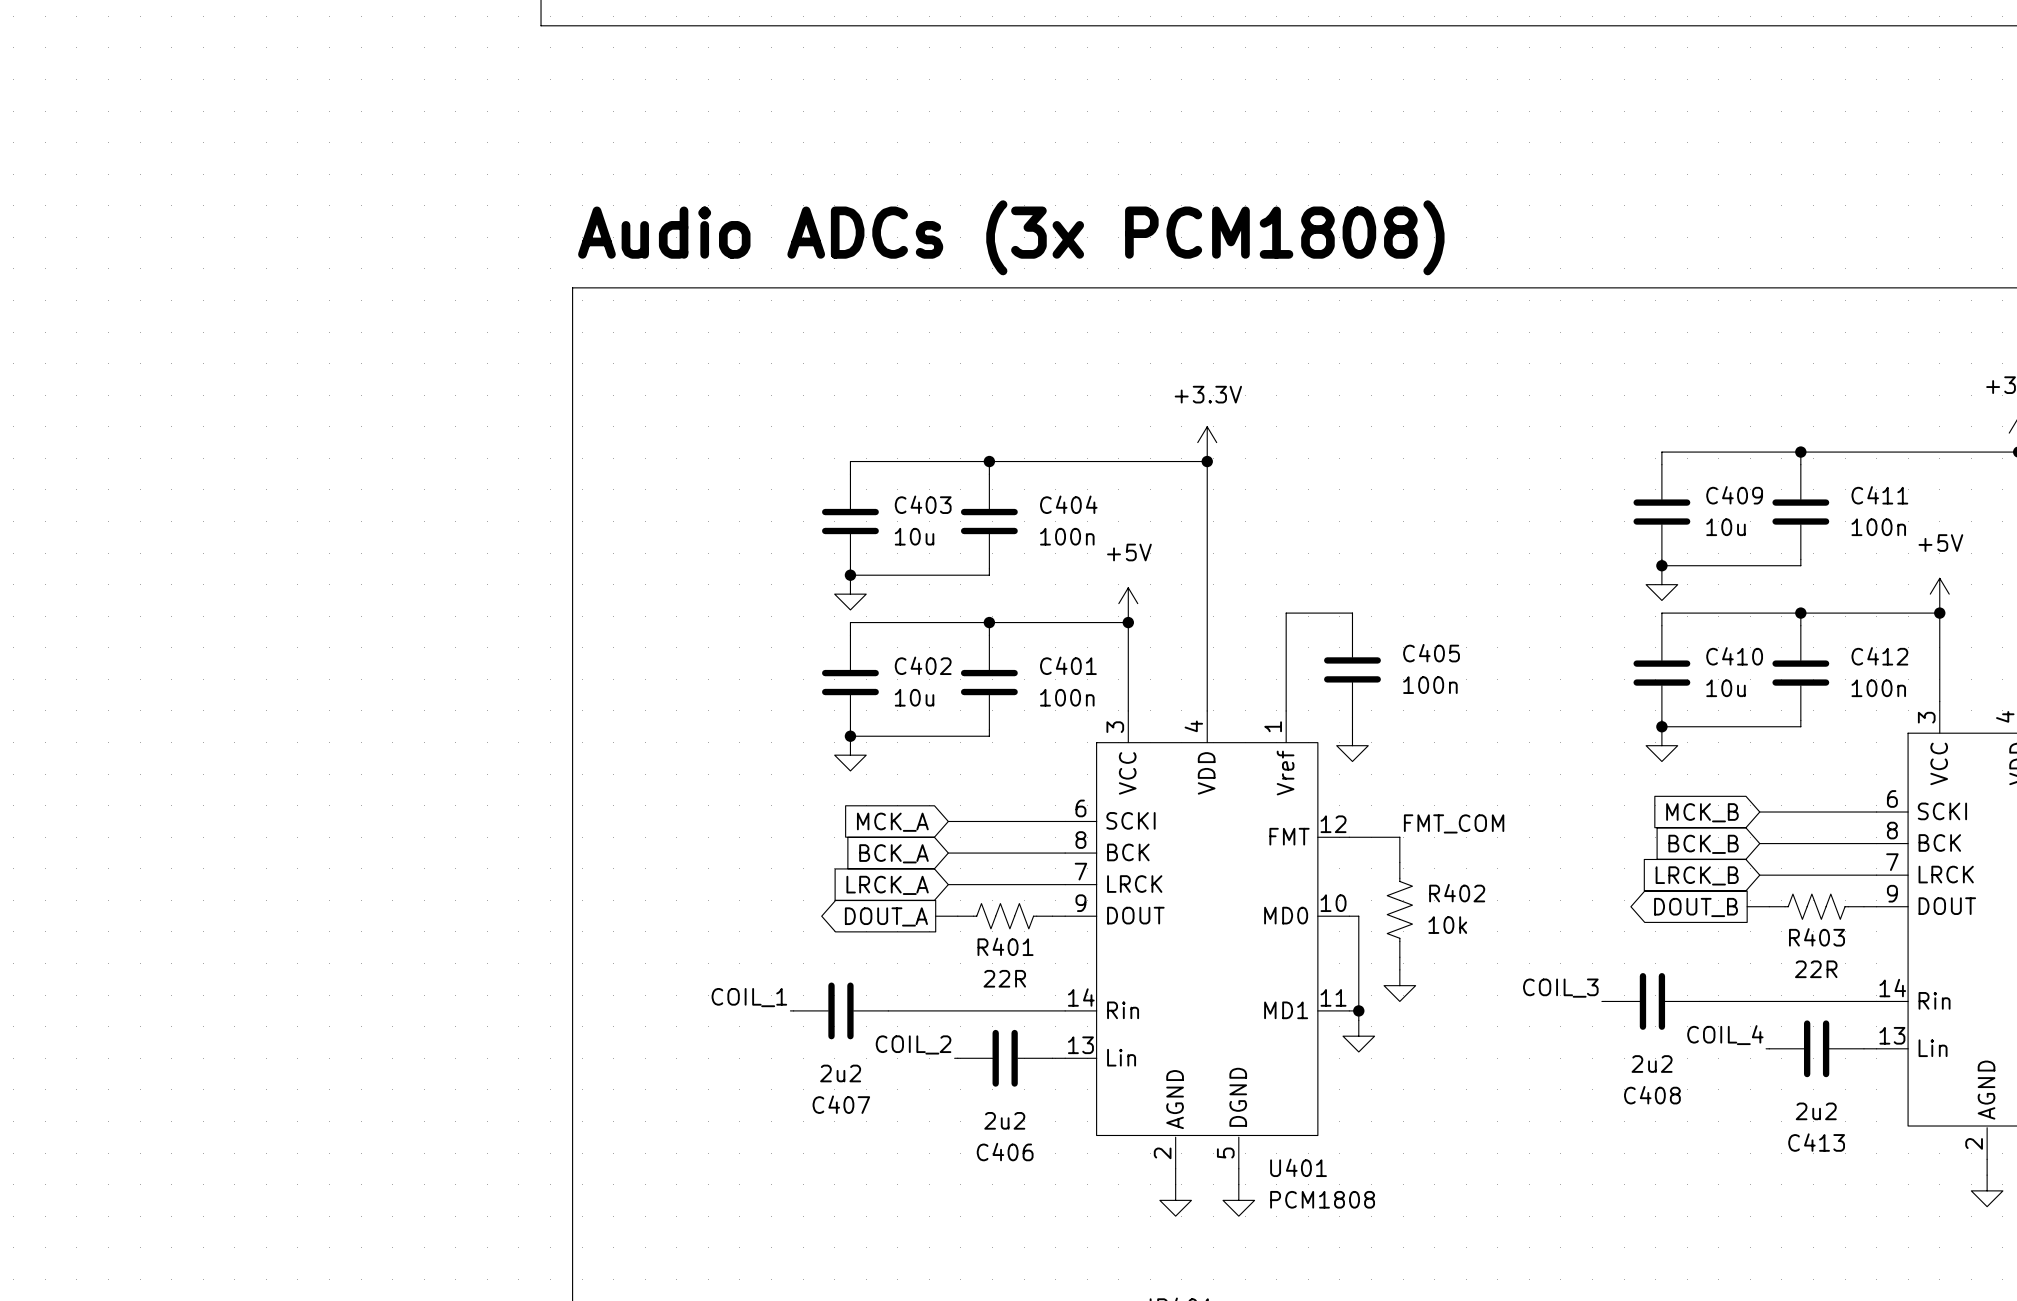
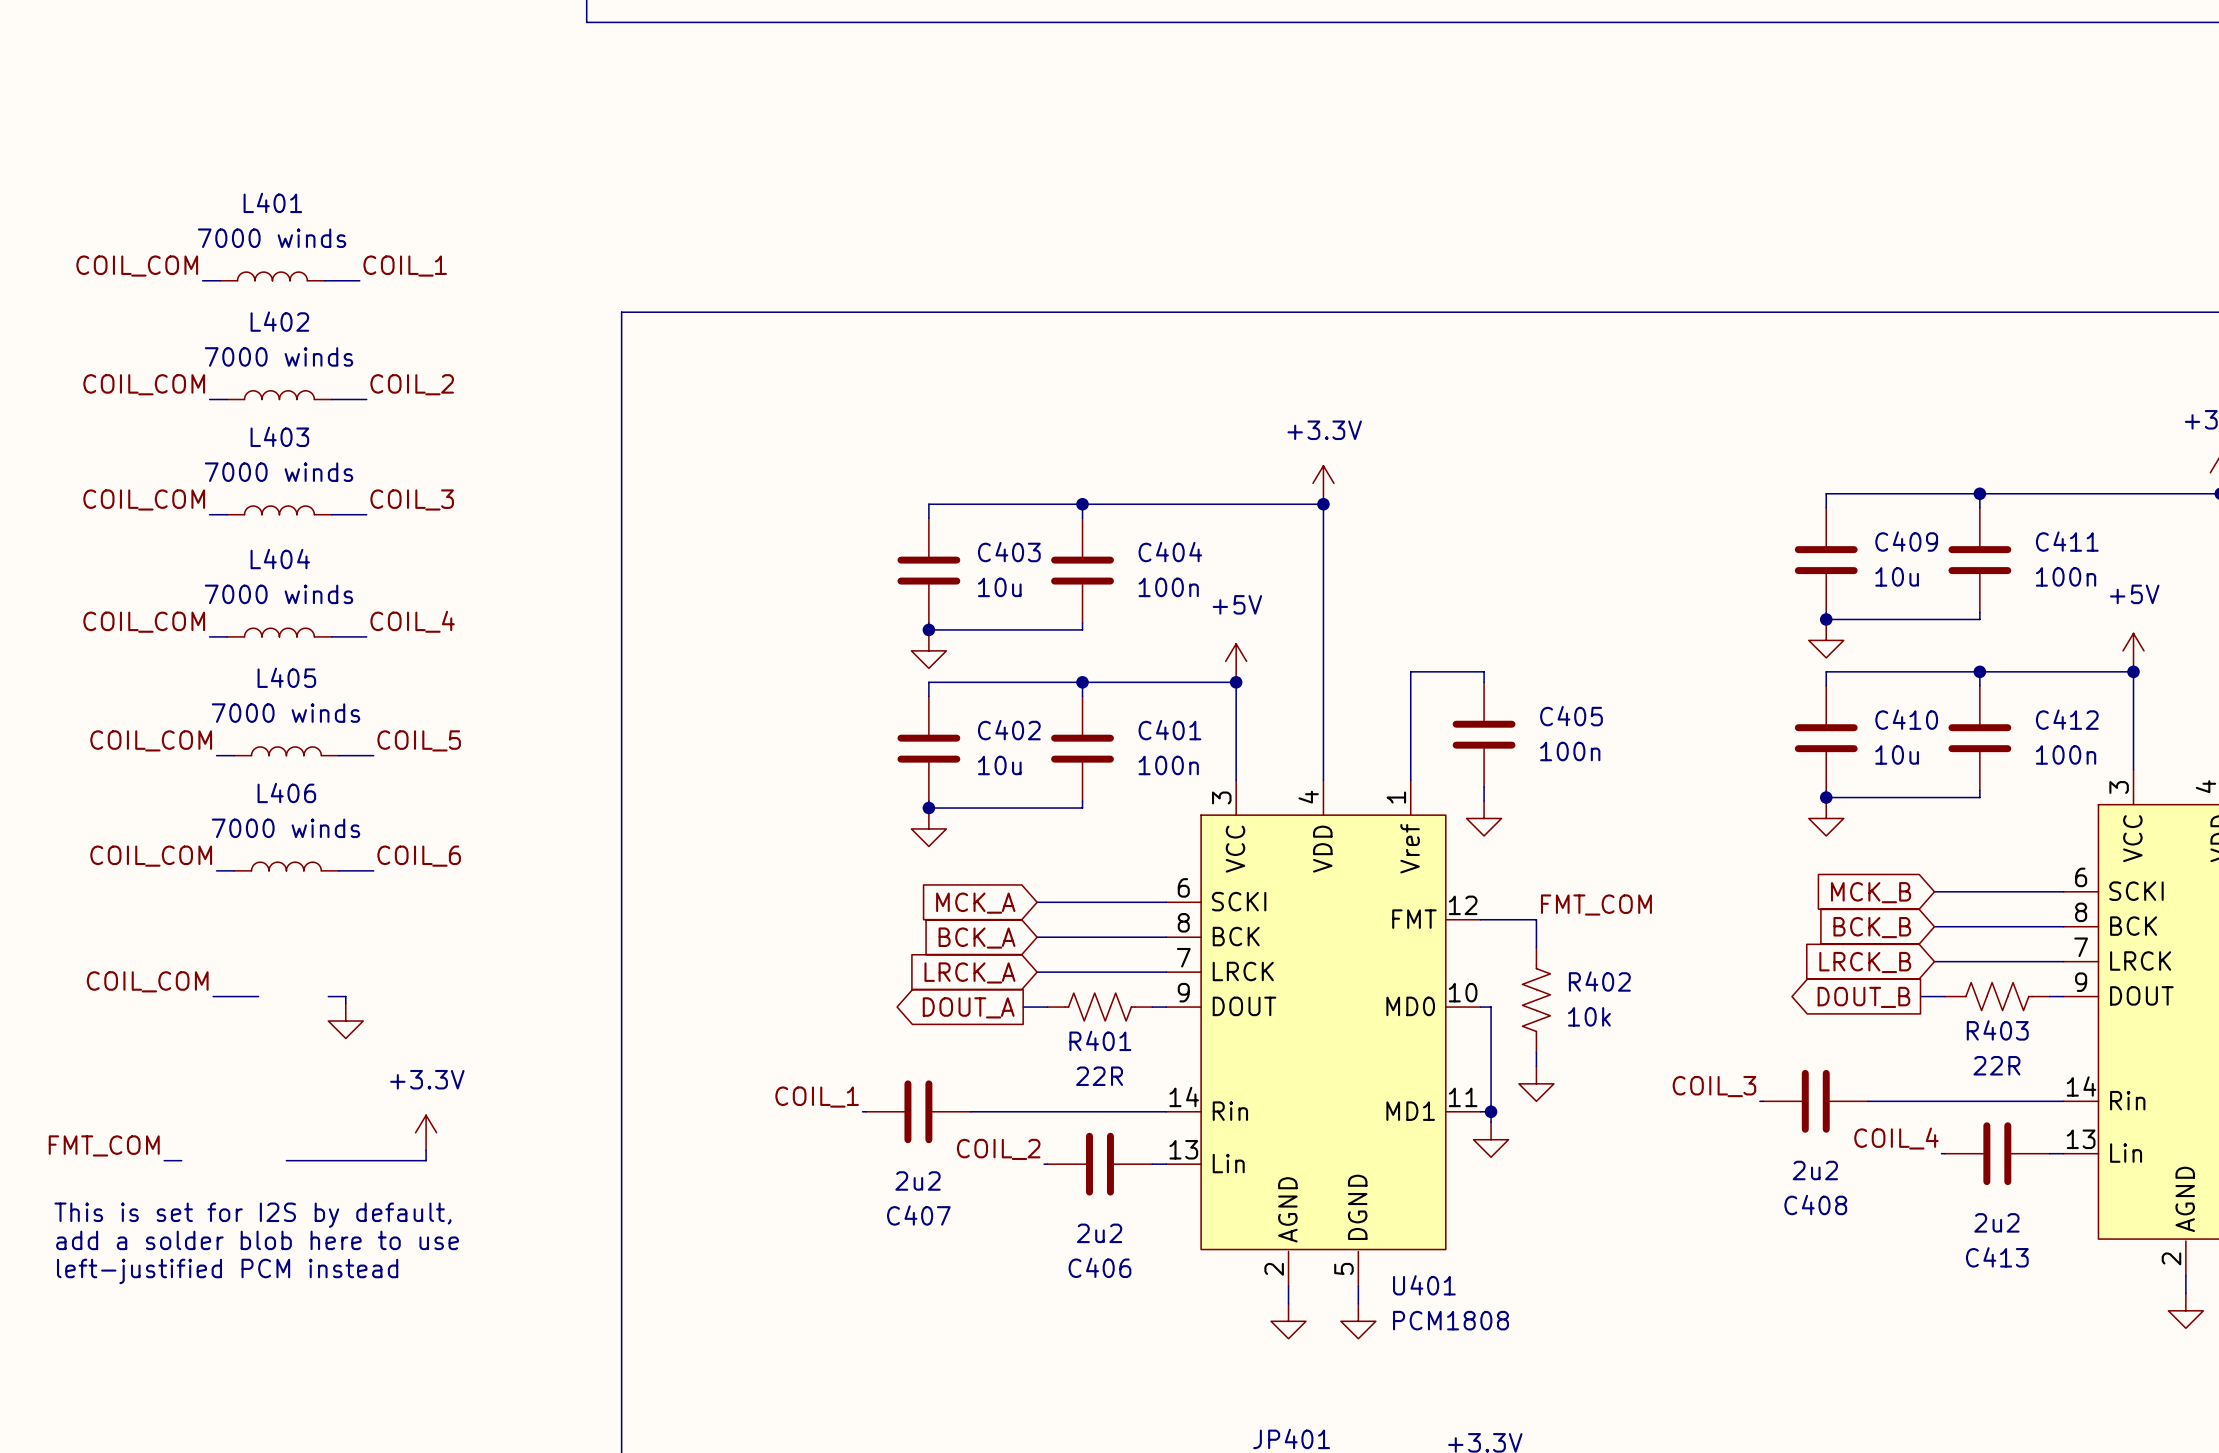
text: Audio ADCs (3x PCM1808) (1011, 237) -> none
label: none -> COIL_COM (137, 266)
label: none -> COIL_1 (405, 266)
L401: none -> 7000 winds (272, 276)
wire: none -> (202, 280) (220, 280)
wire: none -> (324, 280) (359, 280)
label: none -> COIL_COM (144, 384)
label: none -> COIL_2 (412, 384)
L402: none -> 7000 winds (279, 395)
wire: none -> (209, 399) (227, 399)
wire: none -> (331, 399) (366, 399)
label: none -> COIL_COM (144, 499)
label: none -> COIL_3 (412, 499)
L403: none -> 7000 winds (279, 510)
wire: none -> (209, 514) (227, 514)
wire: none -> (331, 514) (366, 514)
label: none -> COIL_4 (412, 621)
label: none -> COIL_COM (144, 622)
L404: none -> 7000 winds (279, 632)
wire: none -> (209, 636) (227, 636)
wire: none -> (331, 636) (366, 636)
label: none -> COIL_COM (151, 740)
label: none -> COIL_5 (419, 740)
L405: none -> 7000 winds (286, 751)
wire: none -> (216, 755) (234, 755)
wire: none -> (338, 755) (373, 755)
label: none -> COIL_COM (151, 856)
label: none -> COIL_6 (419, 856)
L406: none -> 7000 winds (286, 866)
wire: none -> (216, 870) (234, 870)
wire: none -> (338, 870) (373, 870)
label: none -> COIL_COM (147, 981)
wire: none -> (213, 996) (258, 996)
wire: none -> (328, 996) (345, 996) (345, 1003)
power symbol: none -> (345, 1021)
power symbol: none -> +3.3V (426, 1132)
label: none -> FMT_COM (104, 1145)
wire: none -> (426, 1150) (426, 1160) (286, 1160)
wire: none -> (164, 1160) (181, 1160)
text: none -> This is set for I2S by default, (252, 1215)
text: none -> add a solder blob here to use (257, 1240)
text: none -> left-justified PCM instead (227, 1271)

